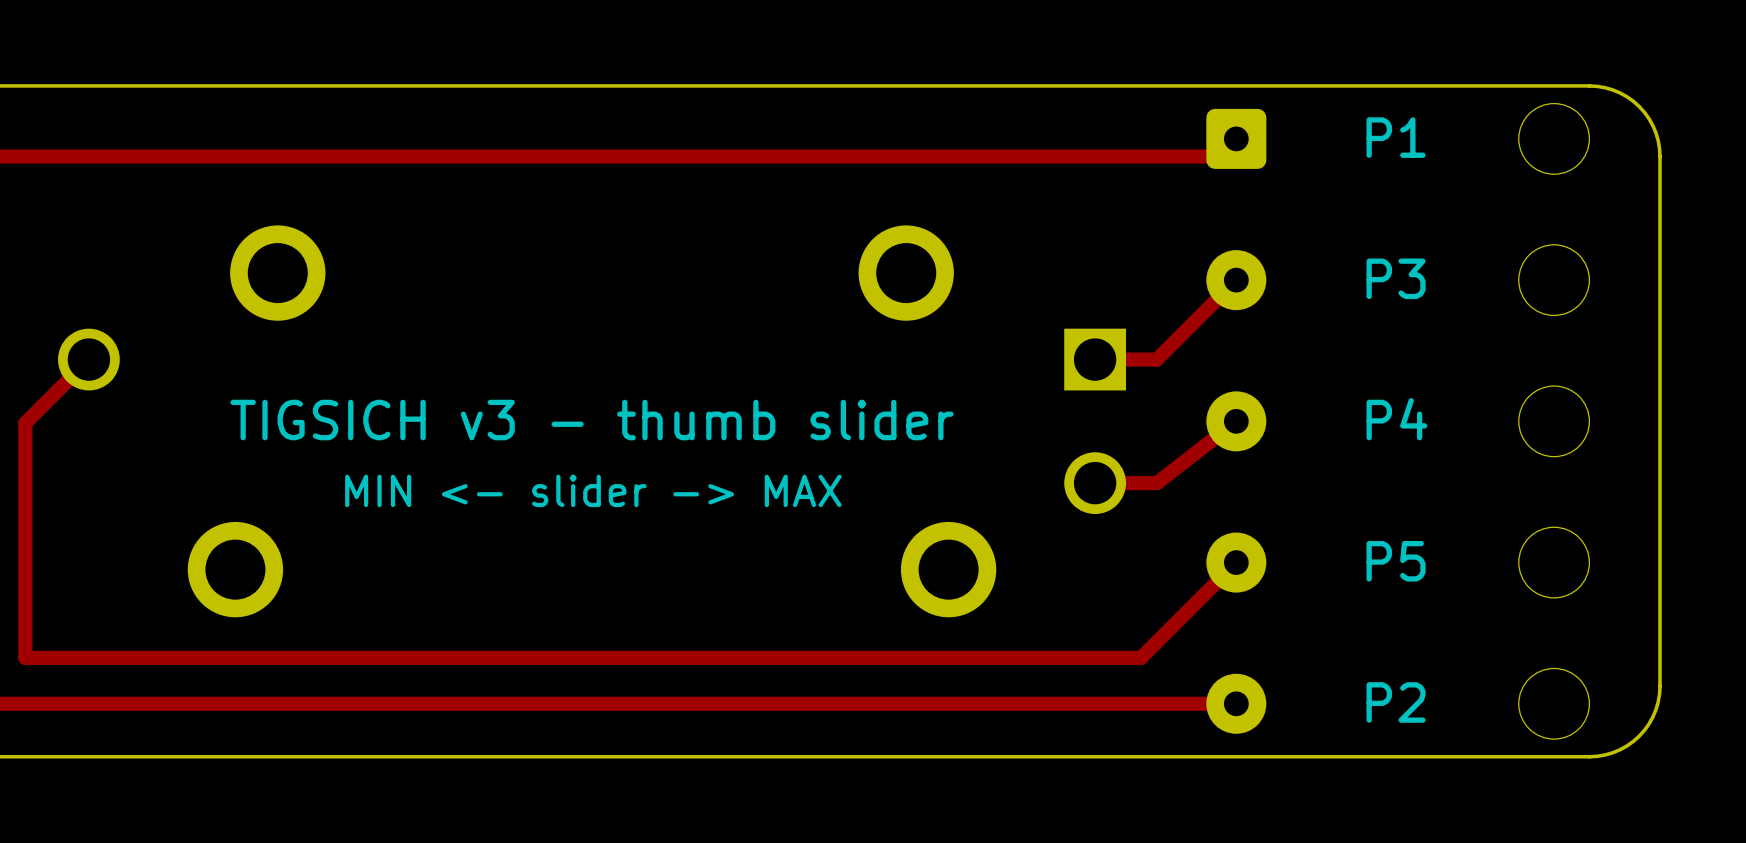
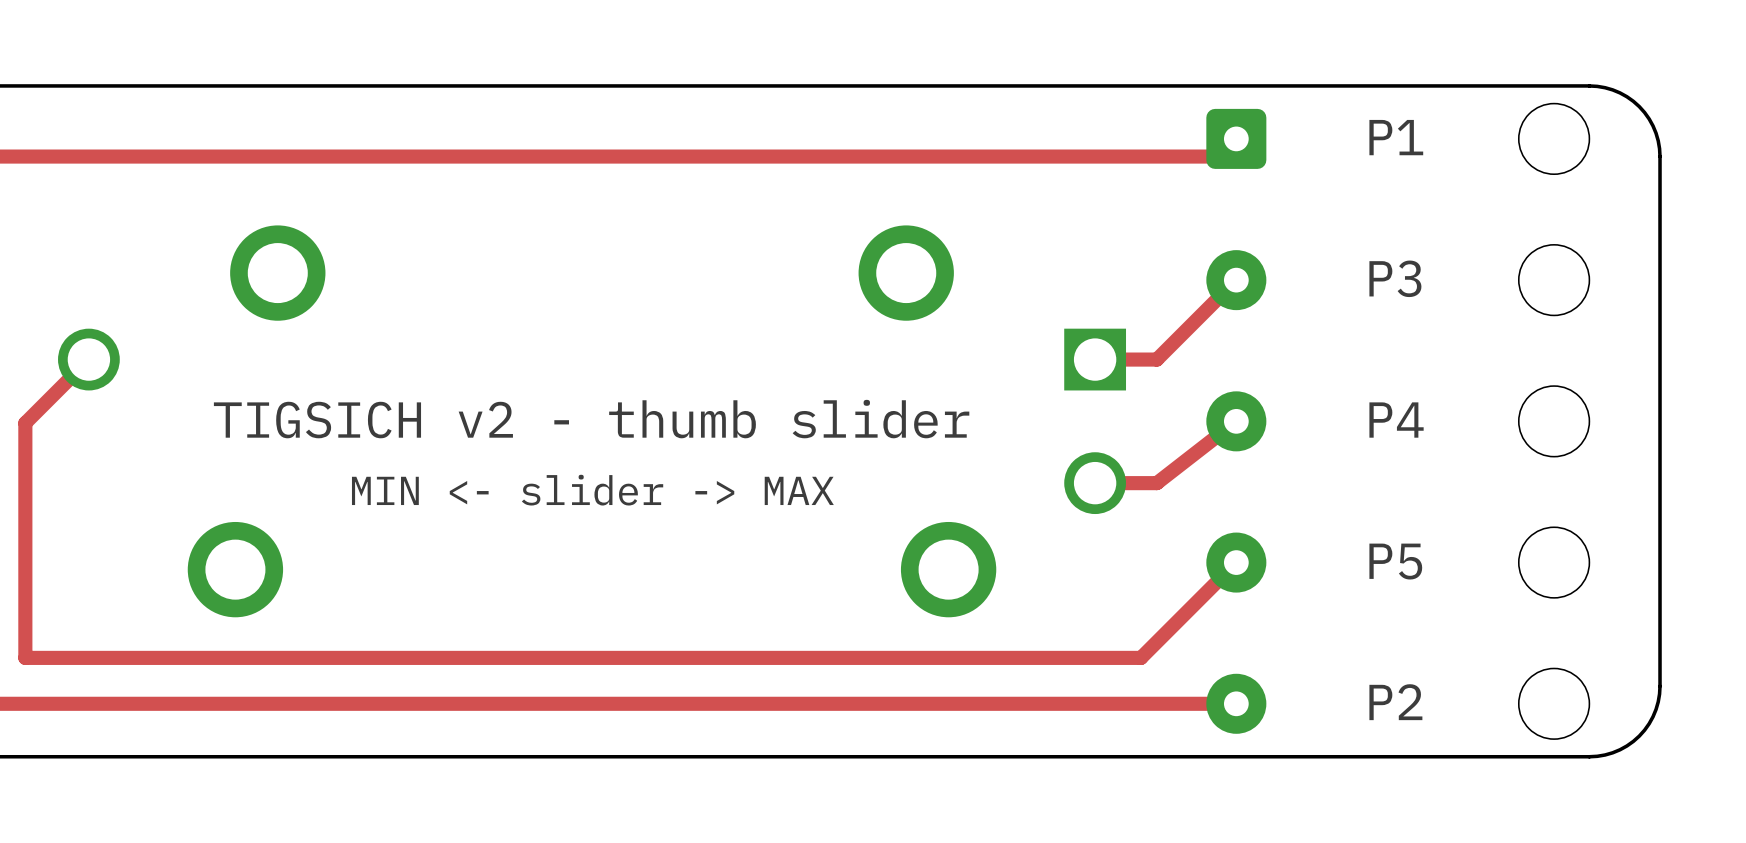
text: TIGSICH v3 - thumb slider (592, 420) -> TIGSICH v2 - thumb slider (591, 419)

